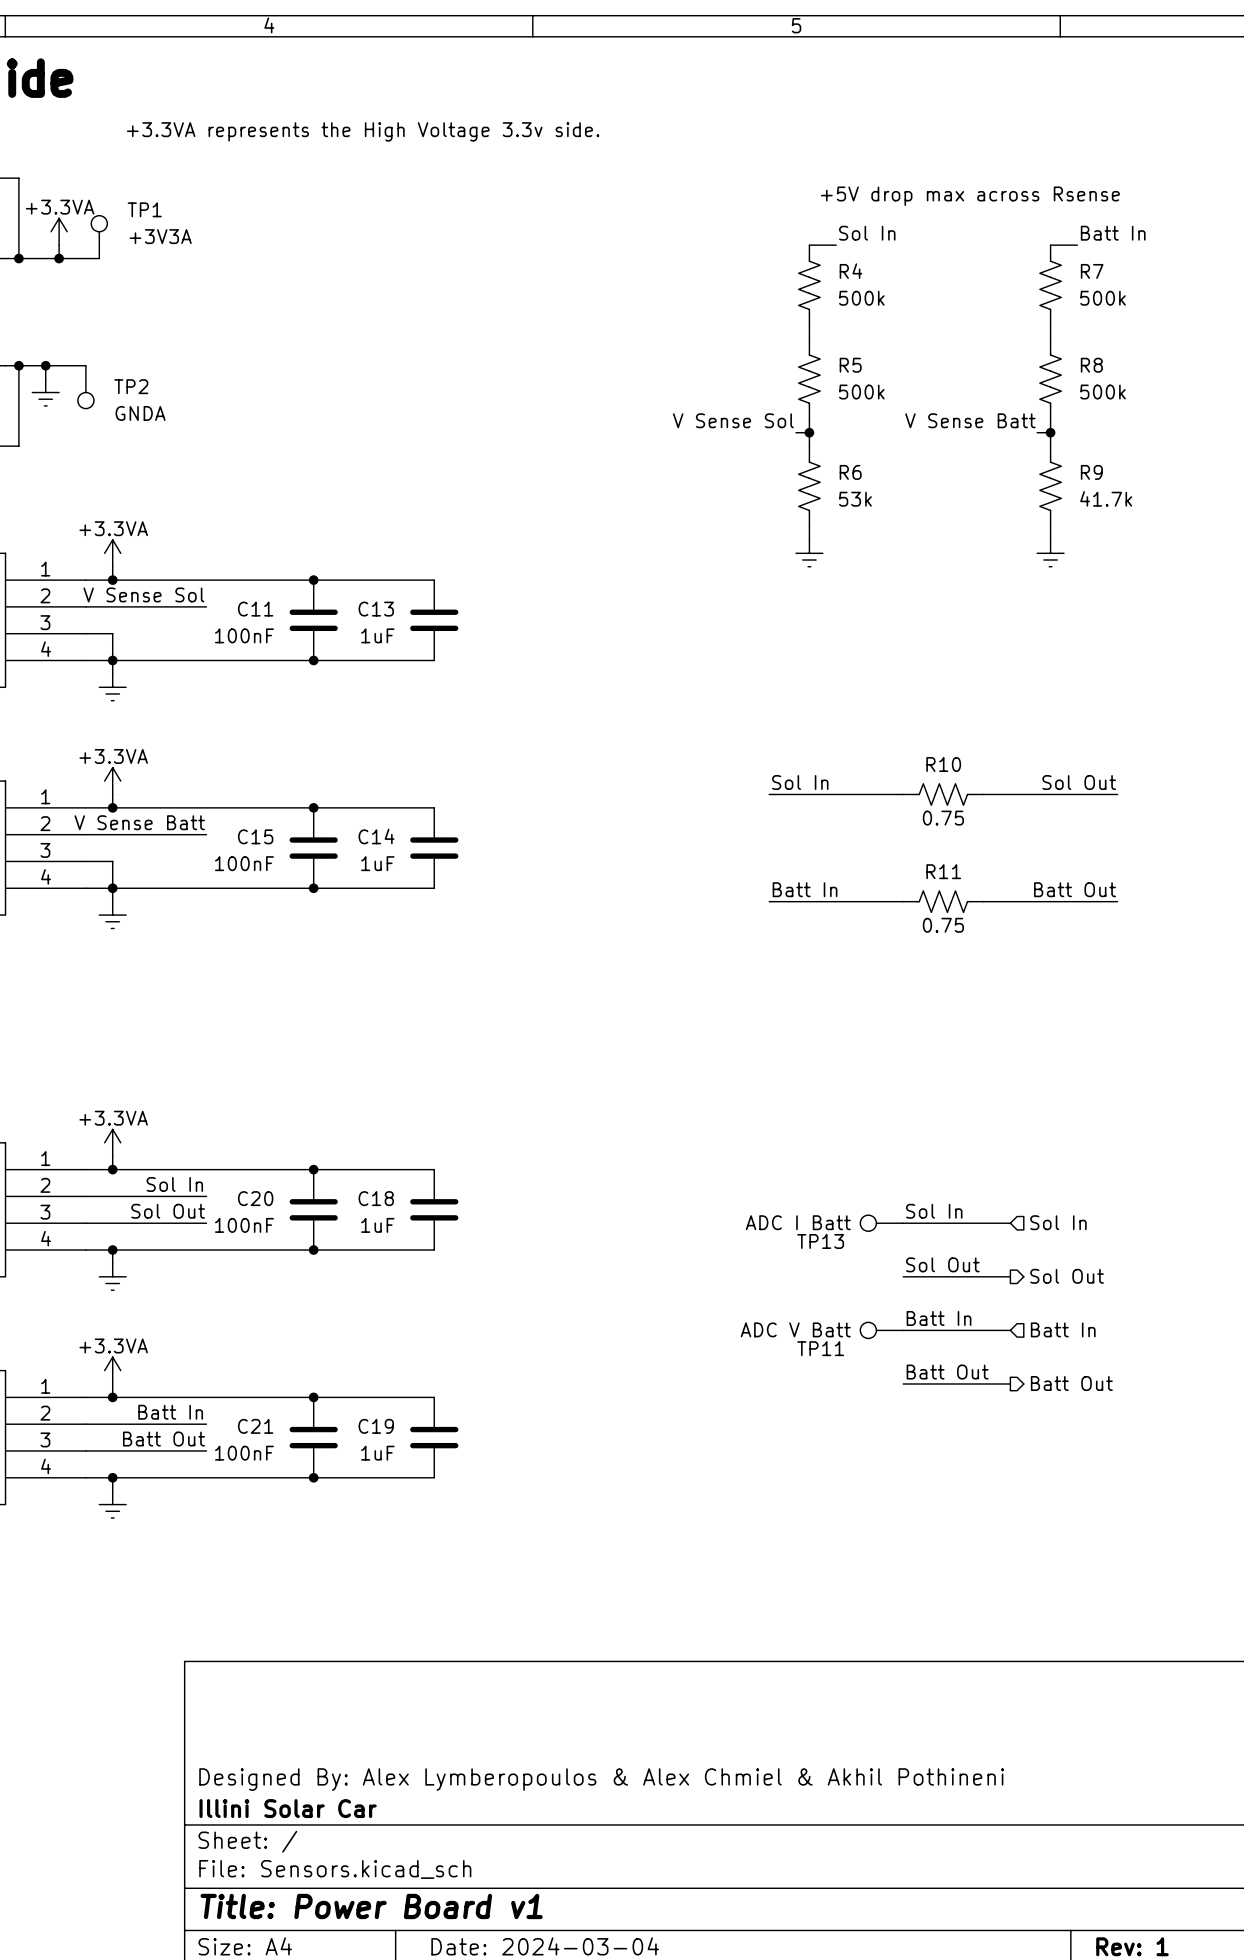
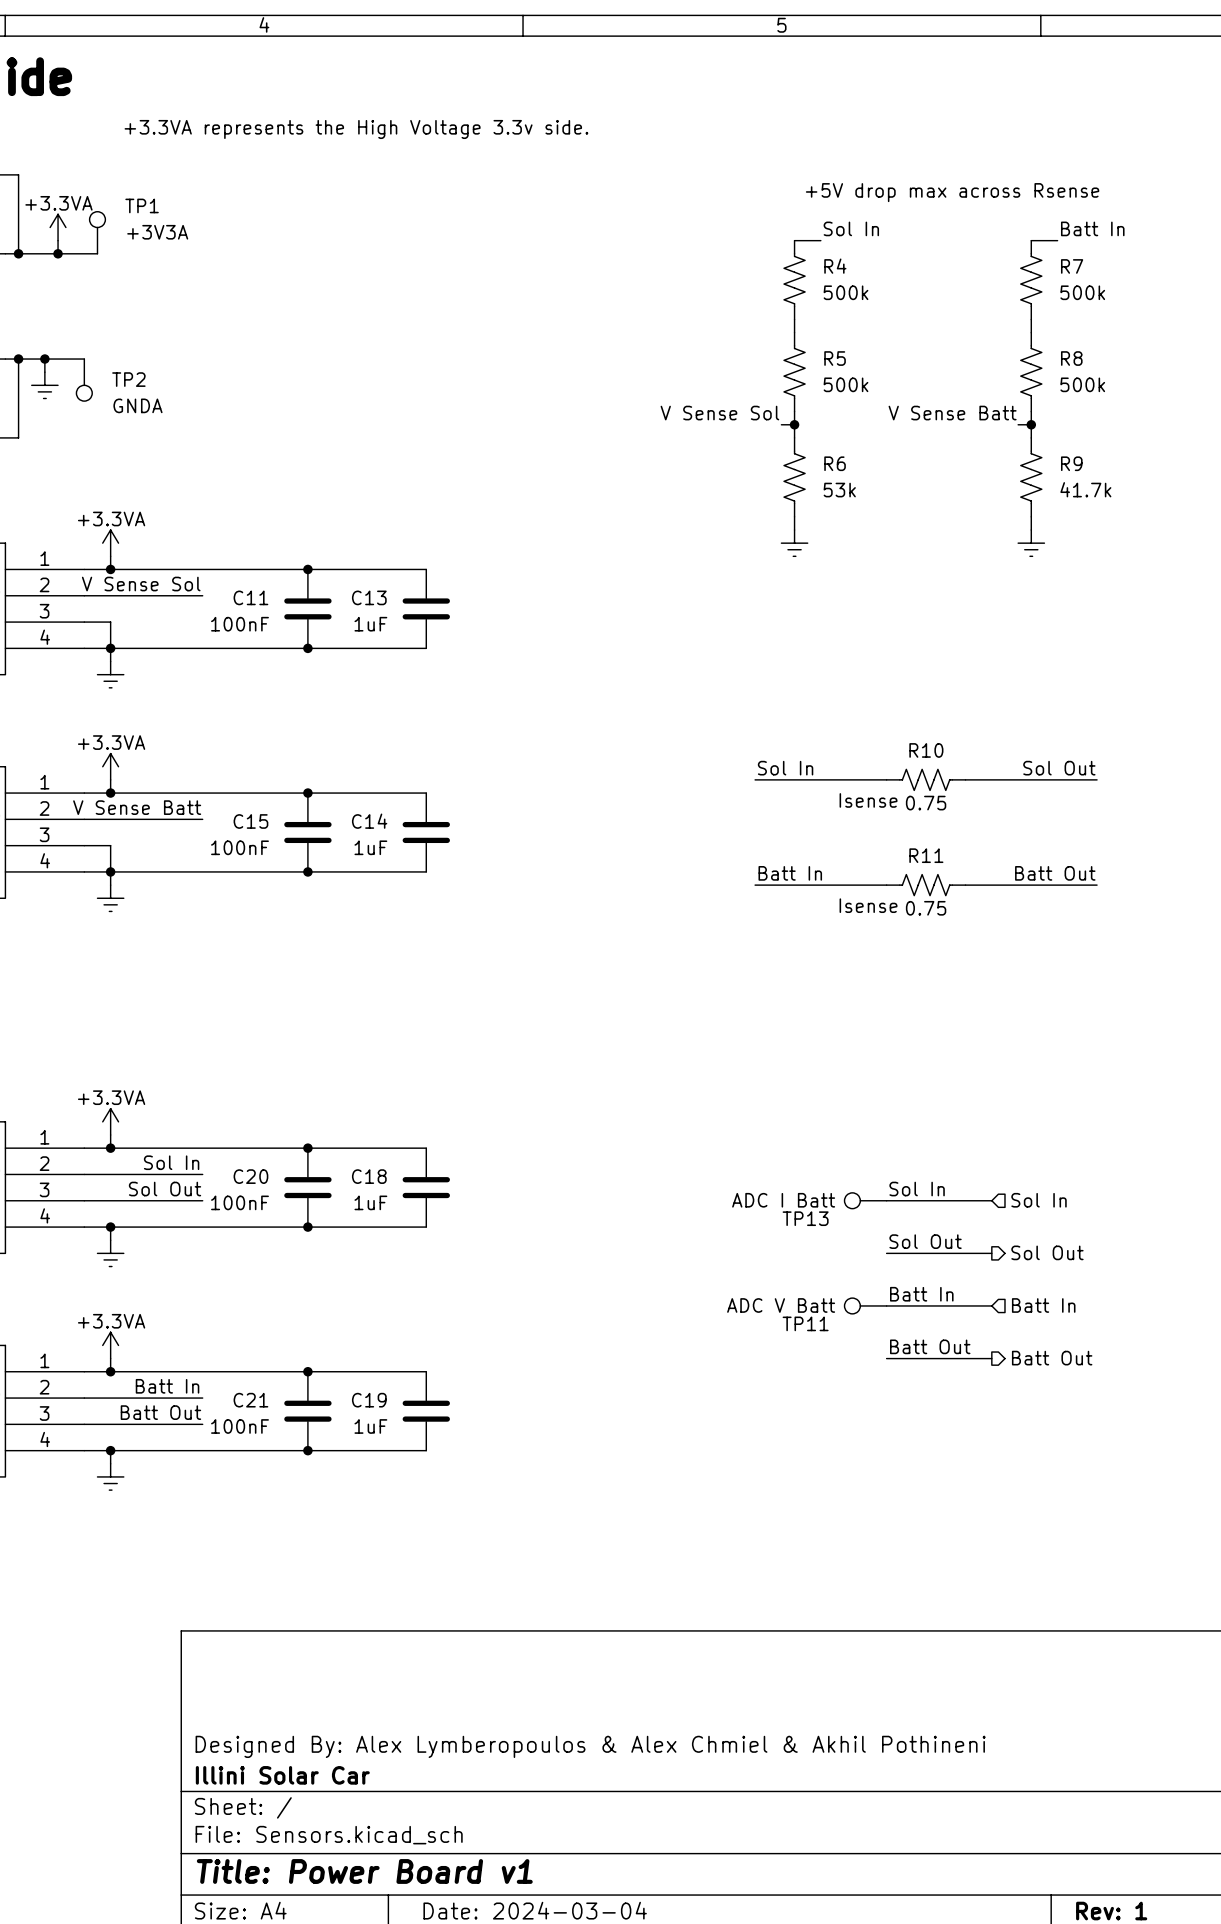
R10 text: none -> Isense (868, 800)
R11 text: none -> Isense (868, 905)

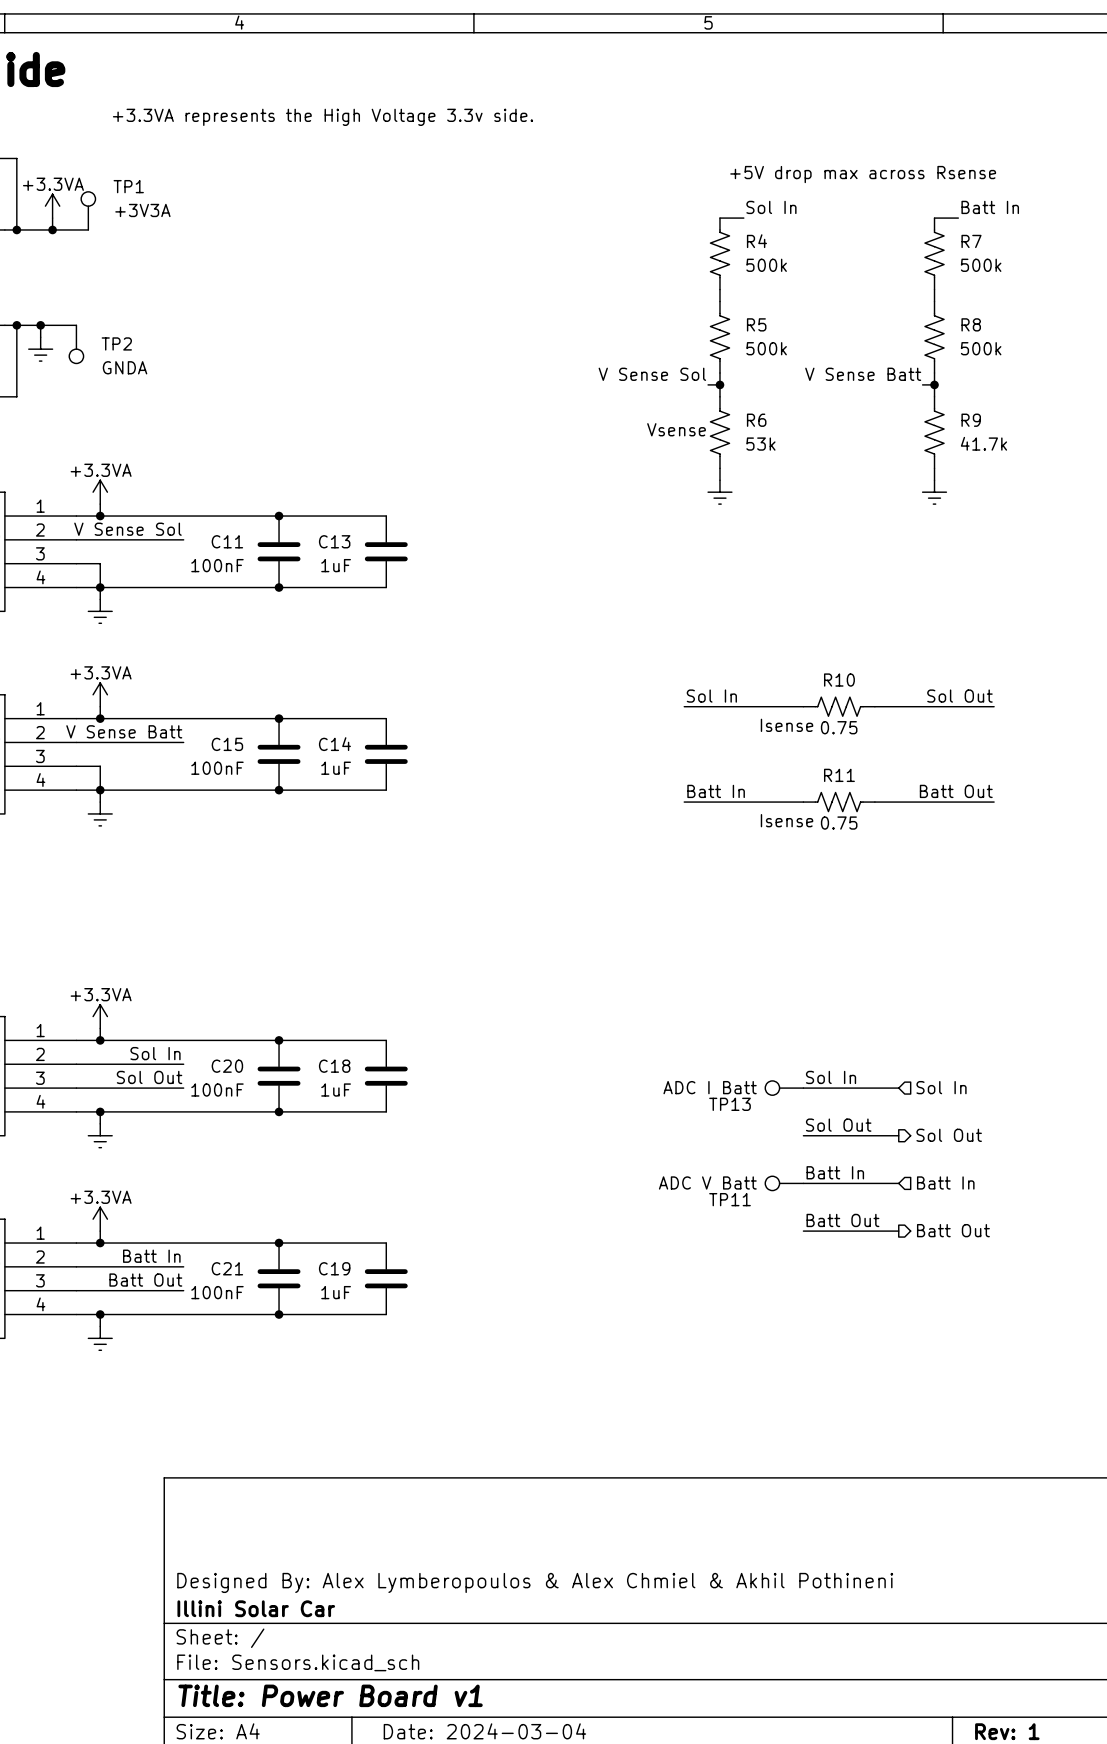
R6 text: none -> Vsense (676, 429)

